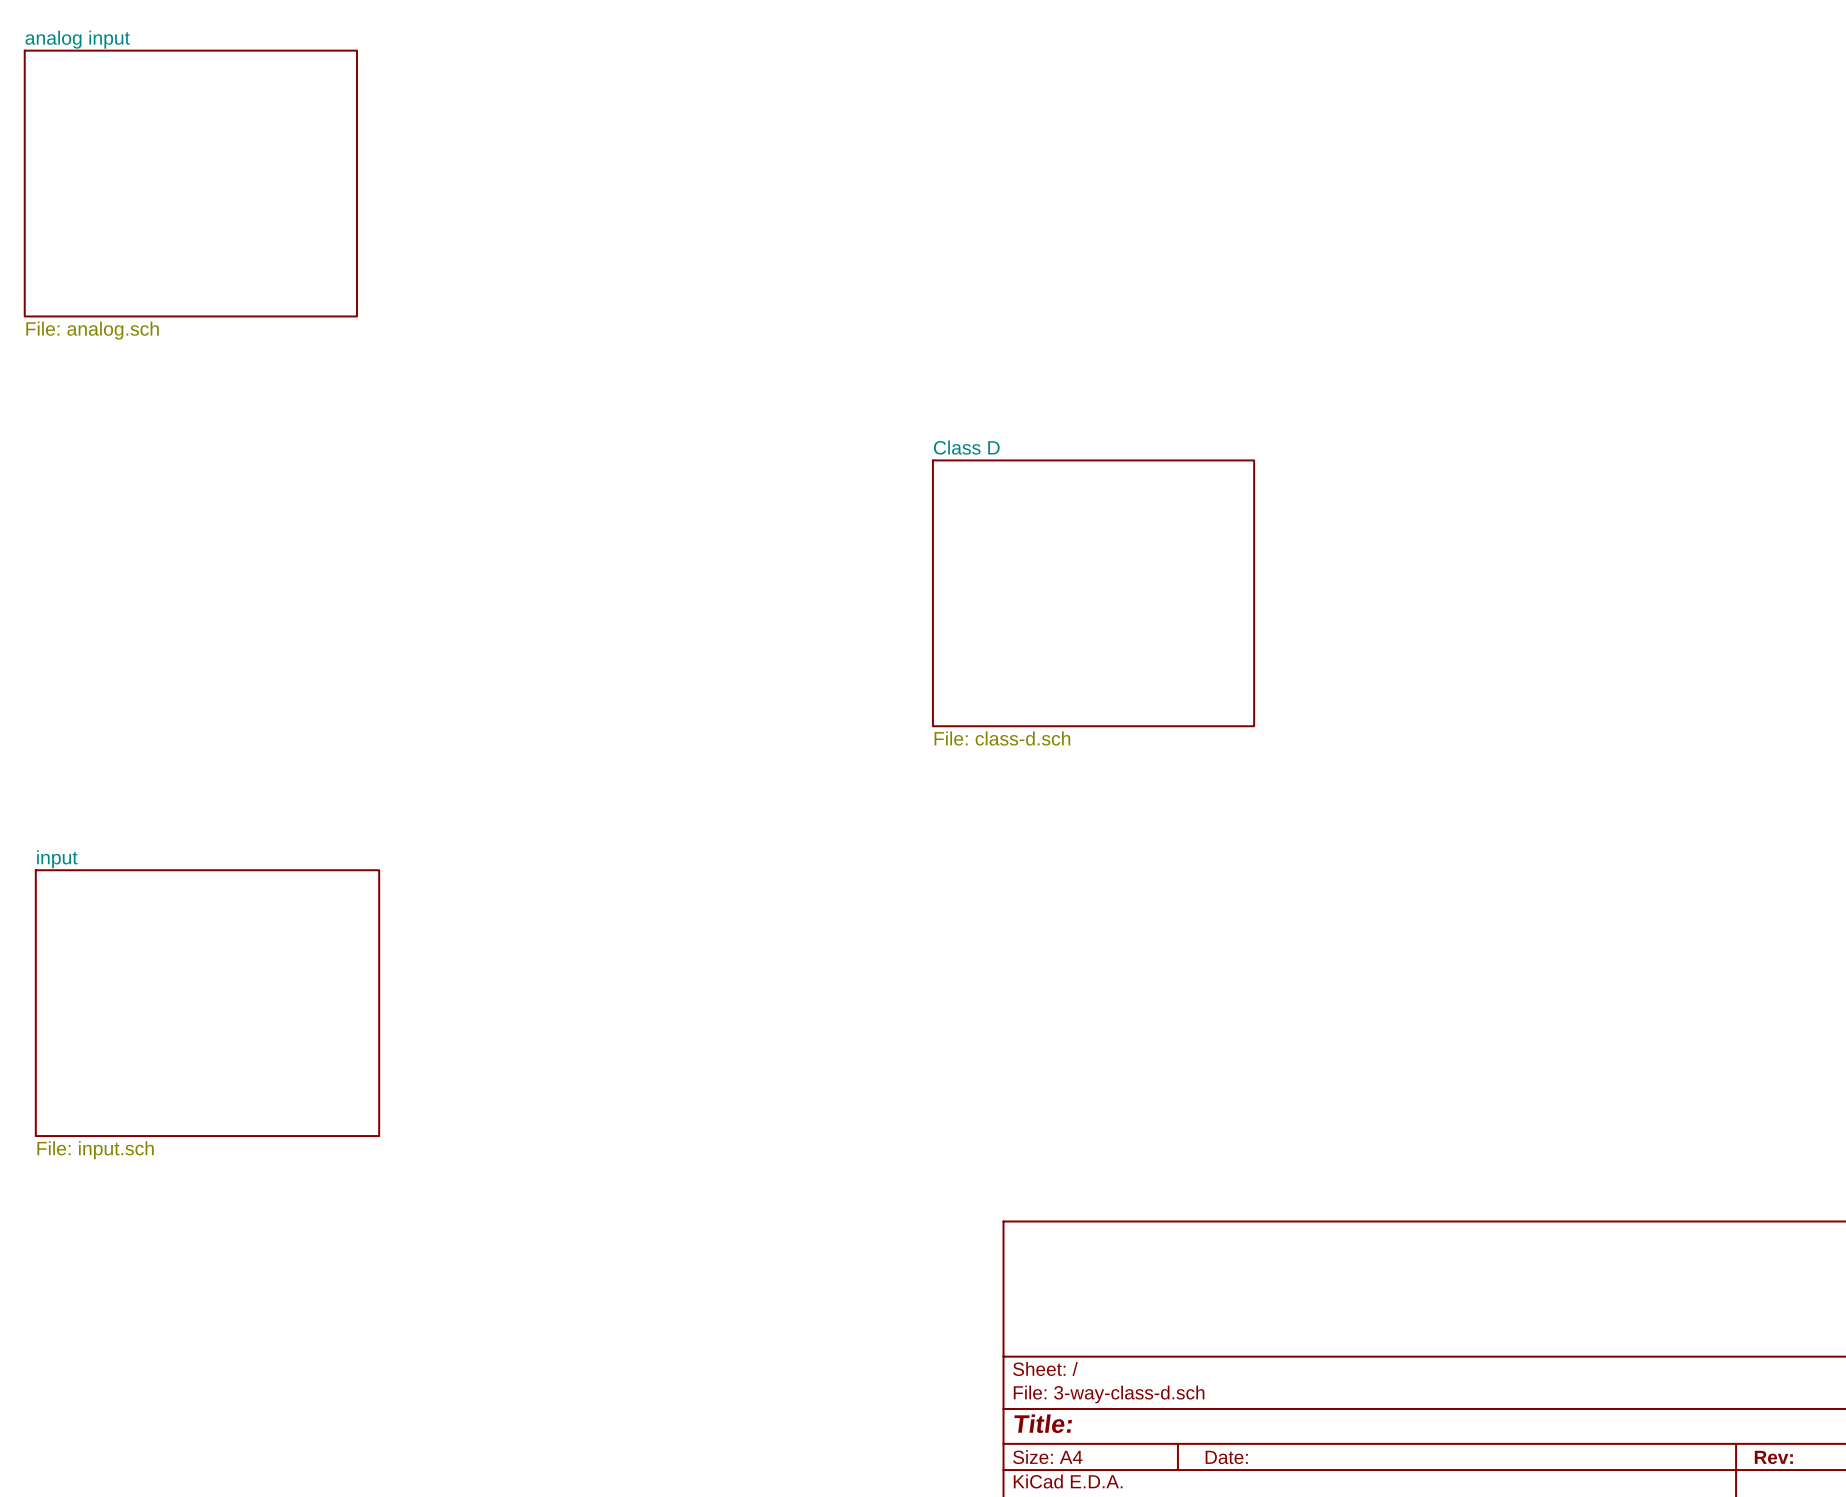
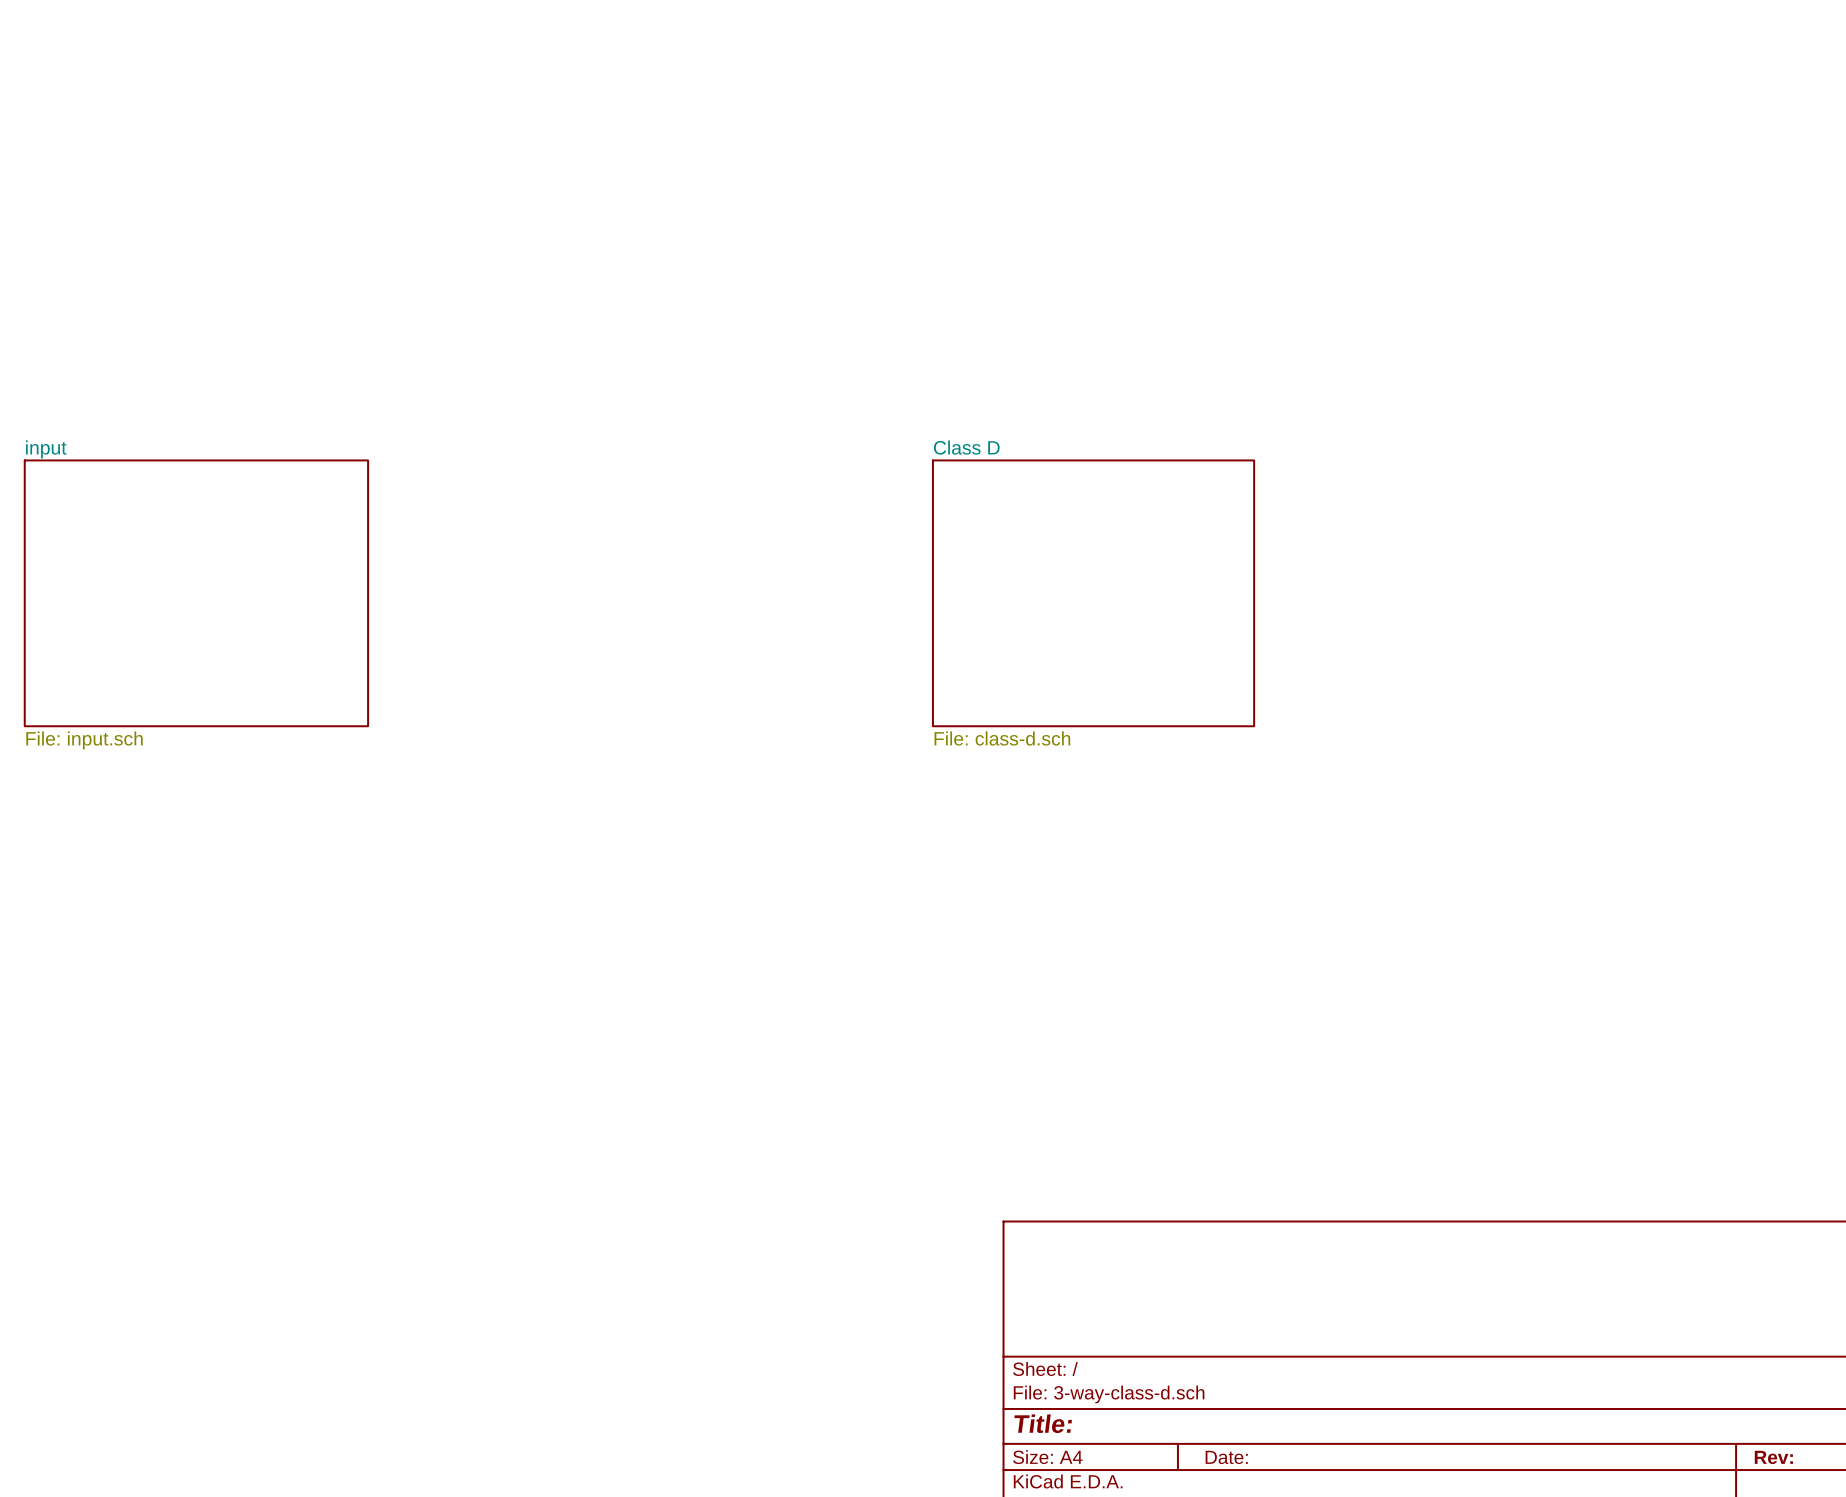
sheet analog input: File: analog.sch (190, 183) -> none
sheet input: none -> File: input.sch (196, 593)
sheet input: File: input.sch (207, 1003) -> none

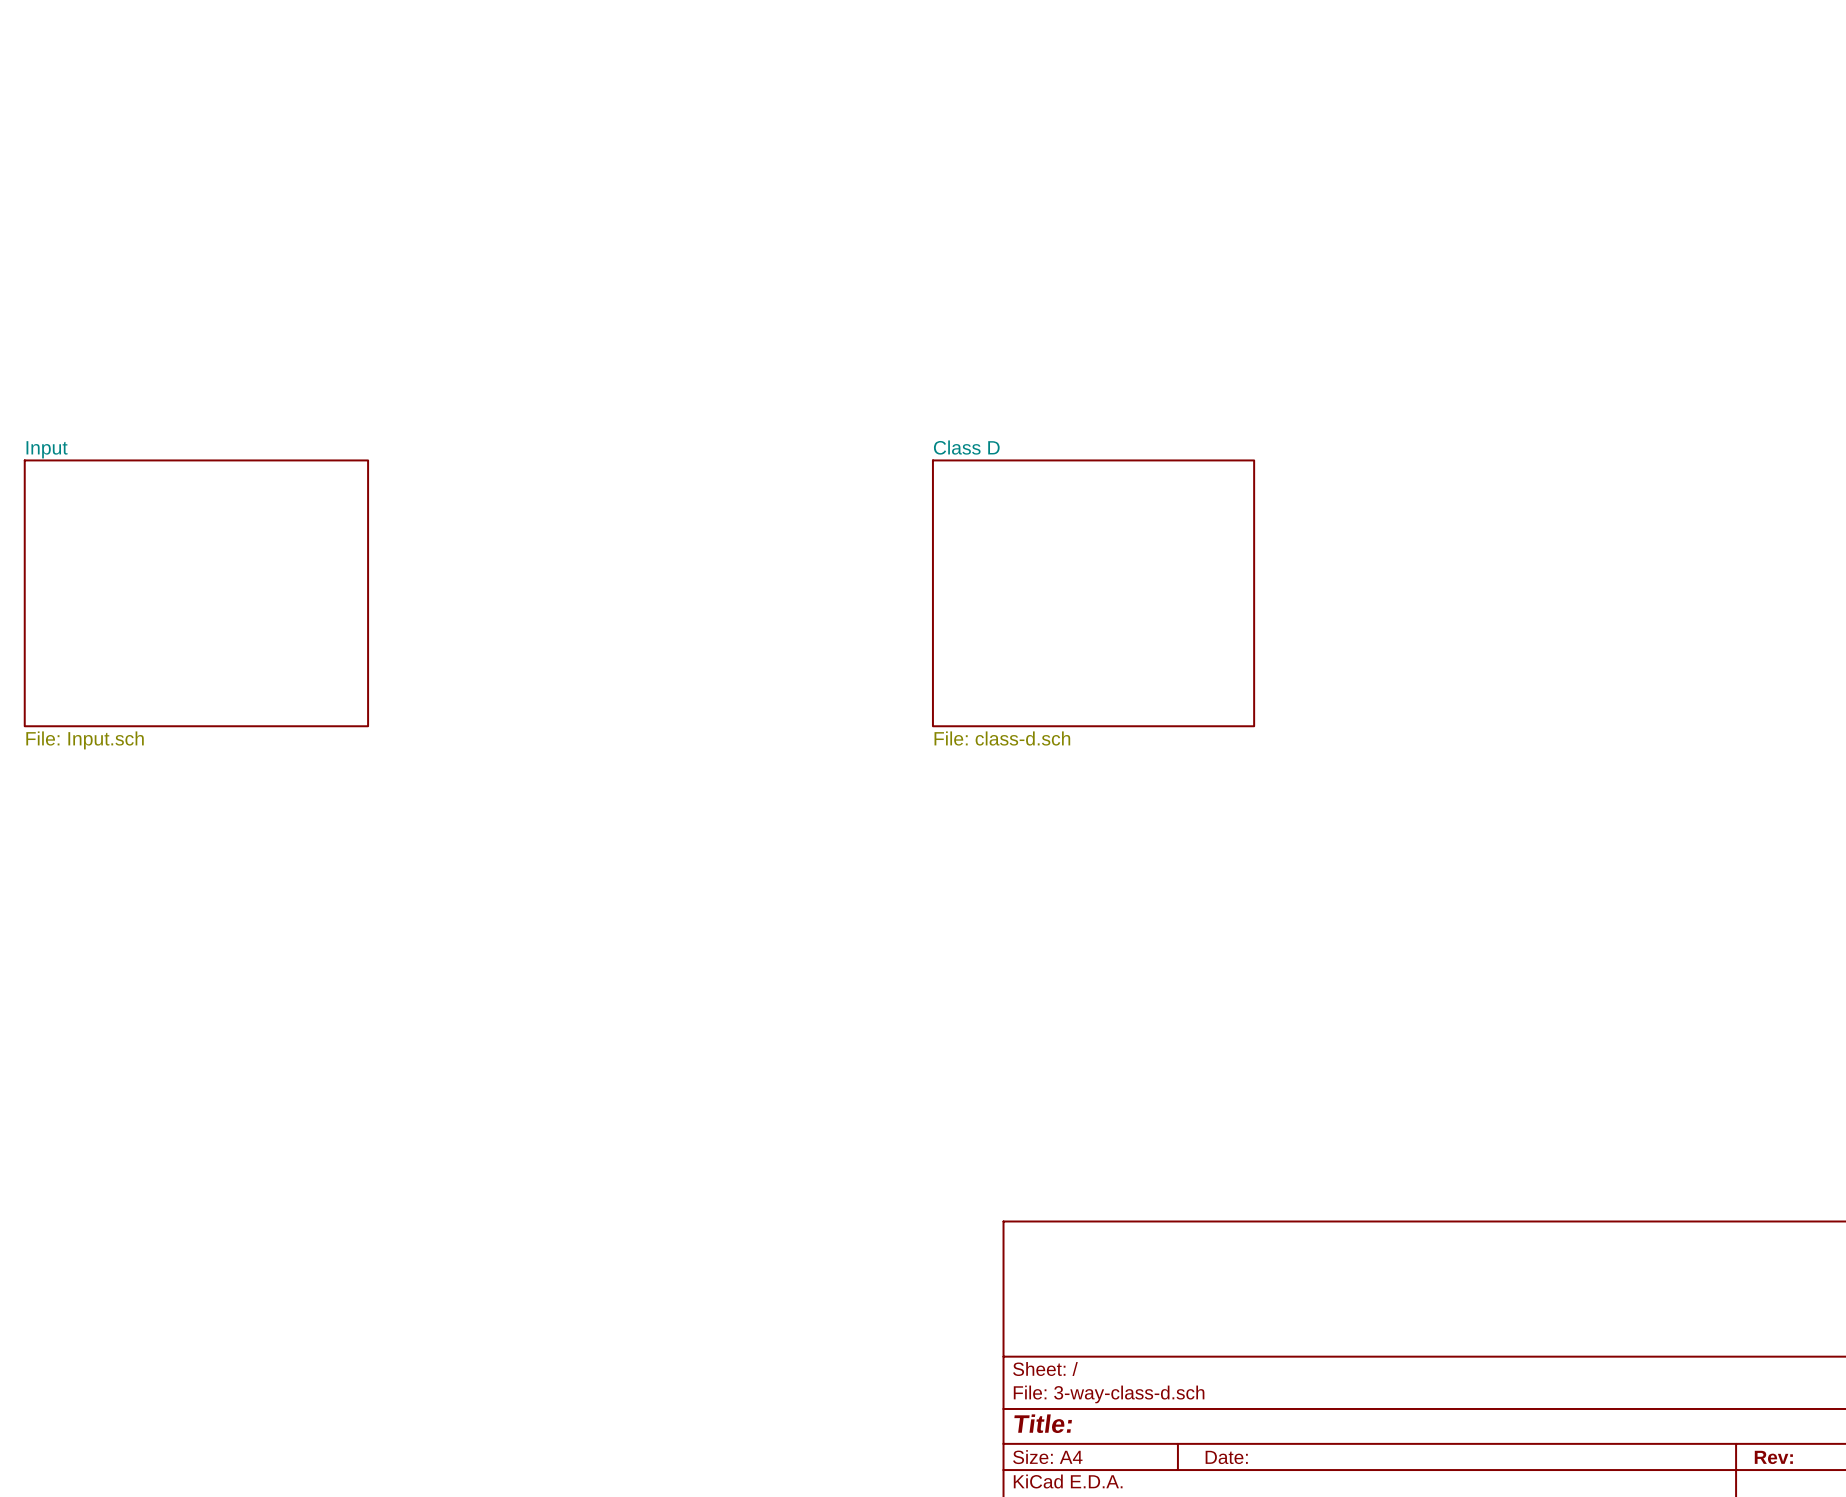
sheet input name: input (46, 449) -> Input (47, 449)
sheet input value: File: input.sch (84, 740) -> File: Input.sch (85, 740)

